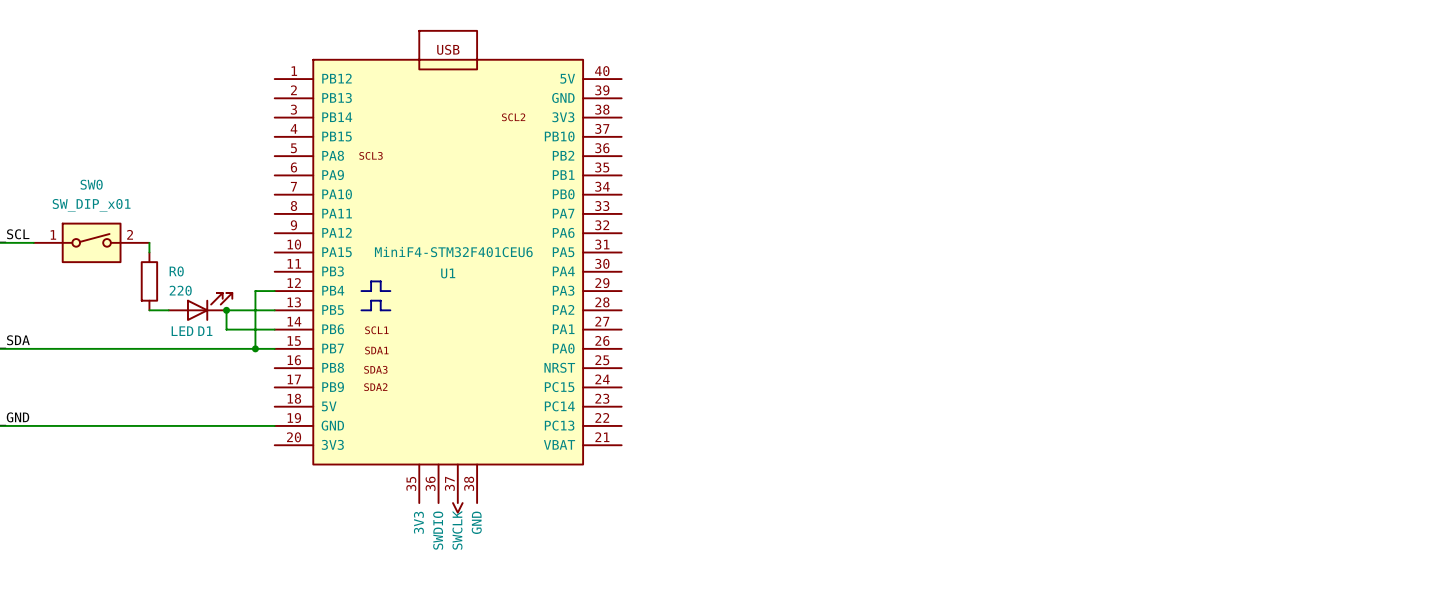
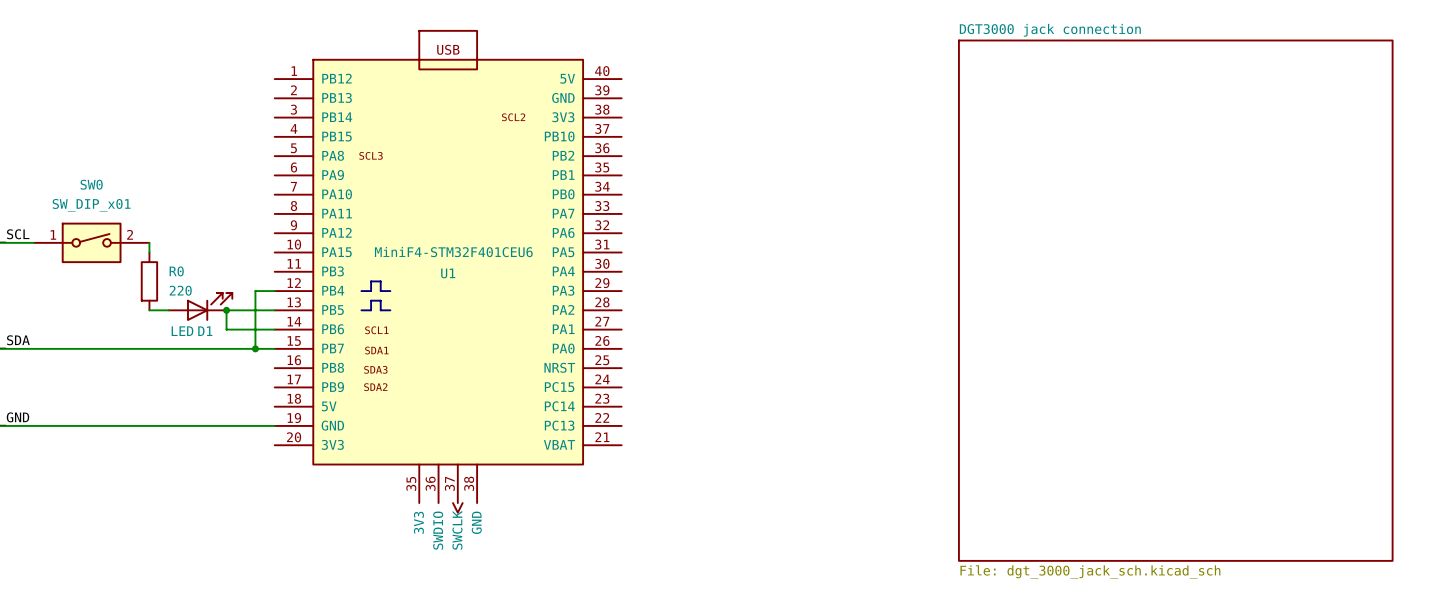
sheet DGT3000 jack connection: none -> File: dgt_3000_jack_sch.kicad_sch (1175, 300)

